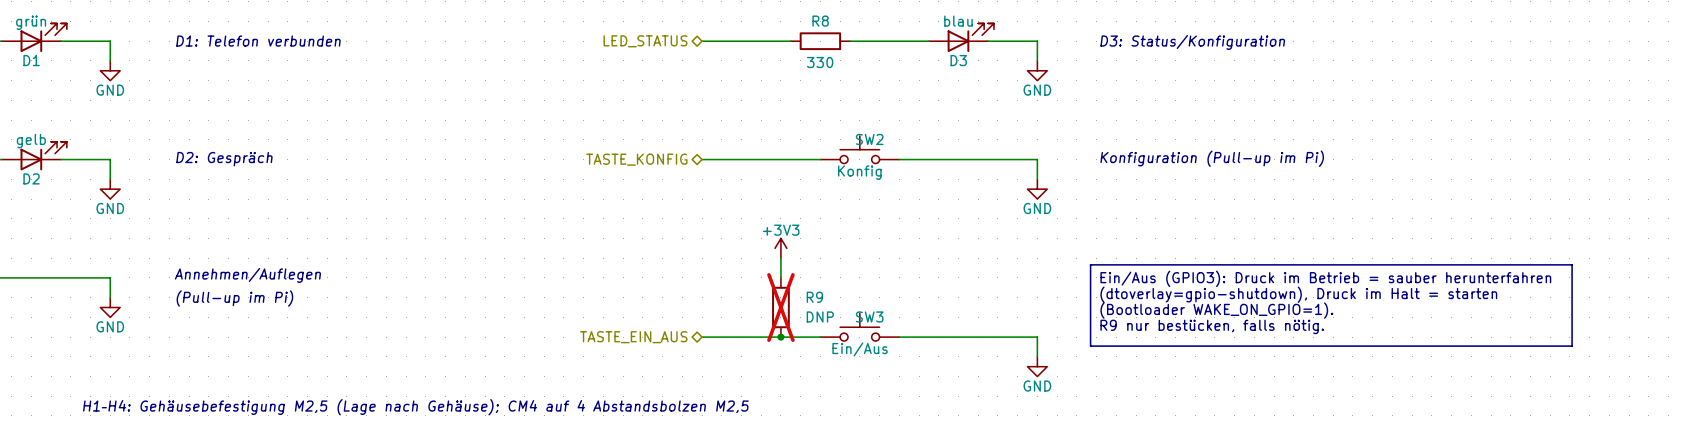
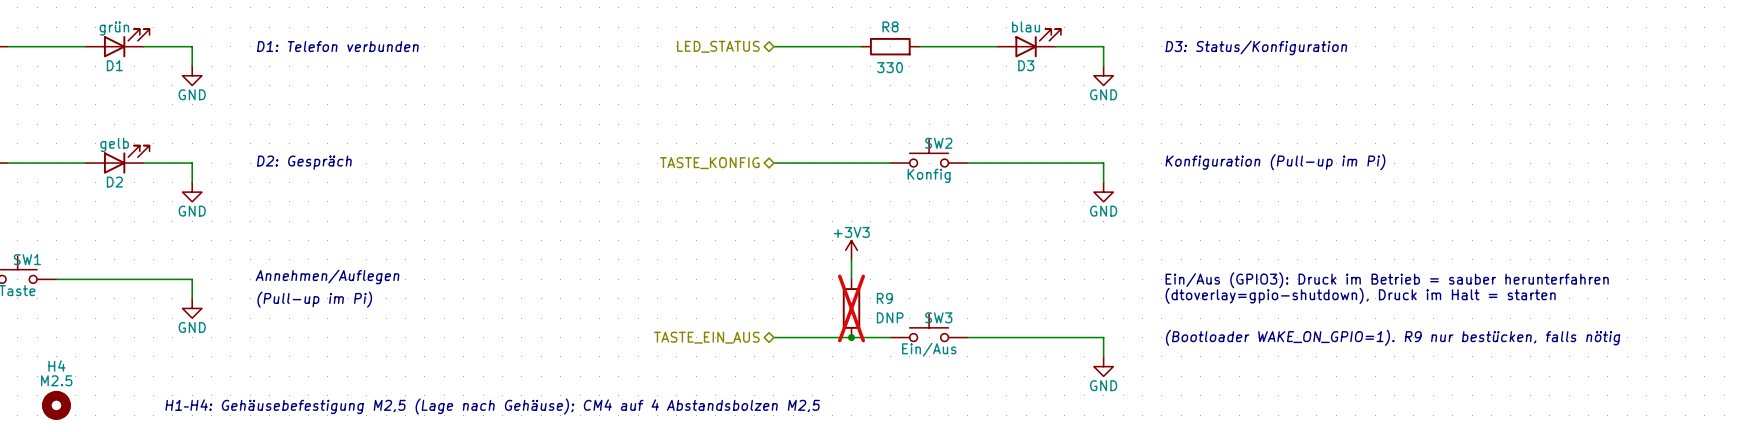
line: (1090, 264) (1572, 264) (1572, 346) (1090, 346) (1090, 264) -> none
text: (Bootloader WAKE_ON_GPIO=1). (1216, 310) -> none
text: R9 nur bestücken, falls nötig. (1212, 326) -> (Bootloader WAKE_ON_GPIO=1). R9 nur bestücken, falls nötig (1393, 337)

